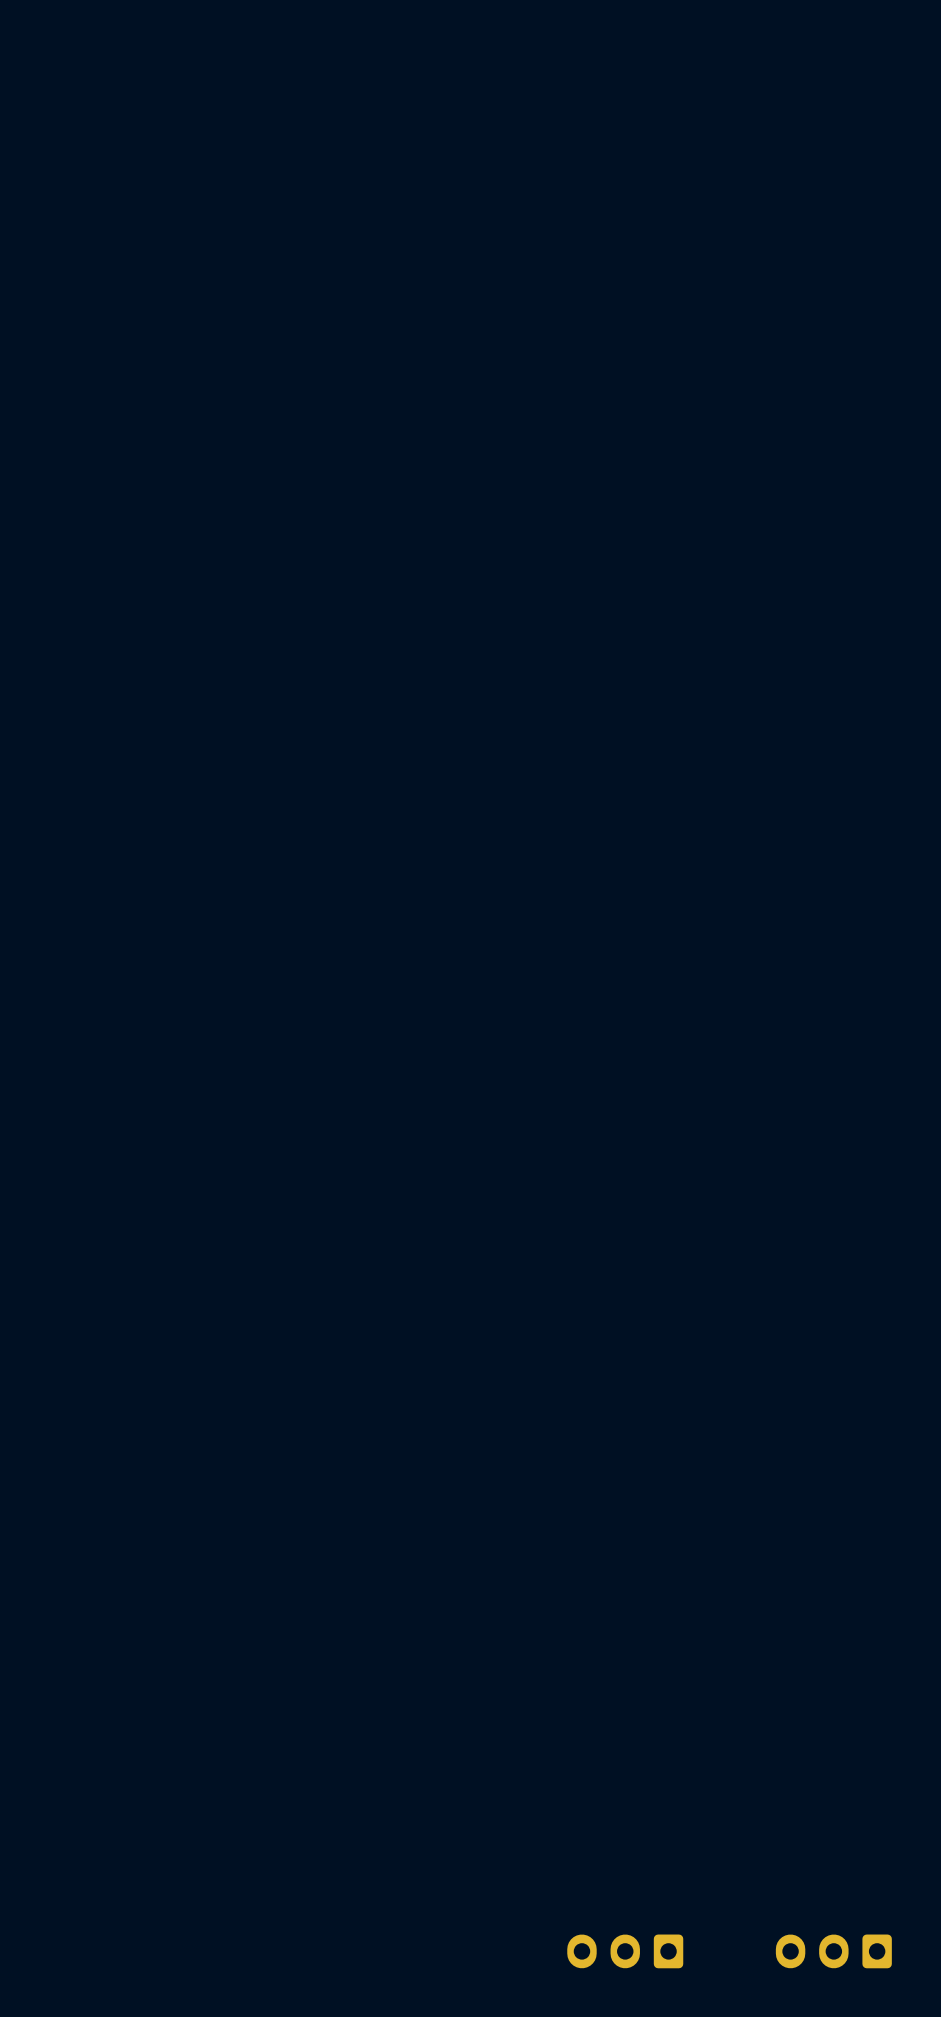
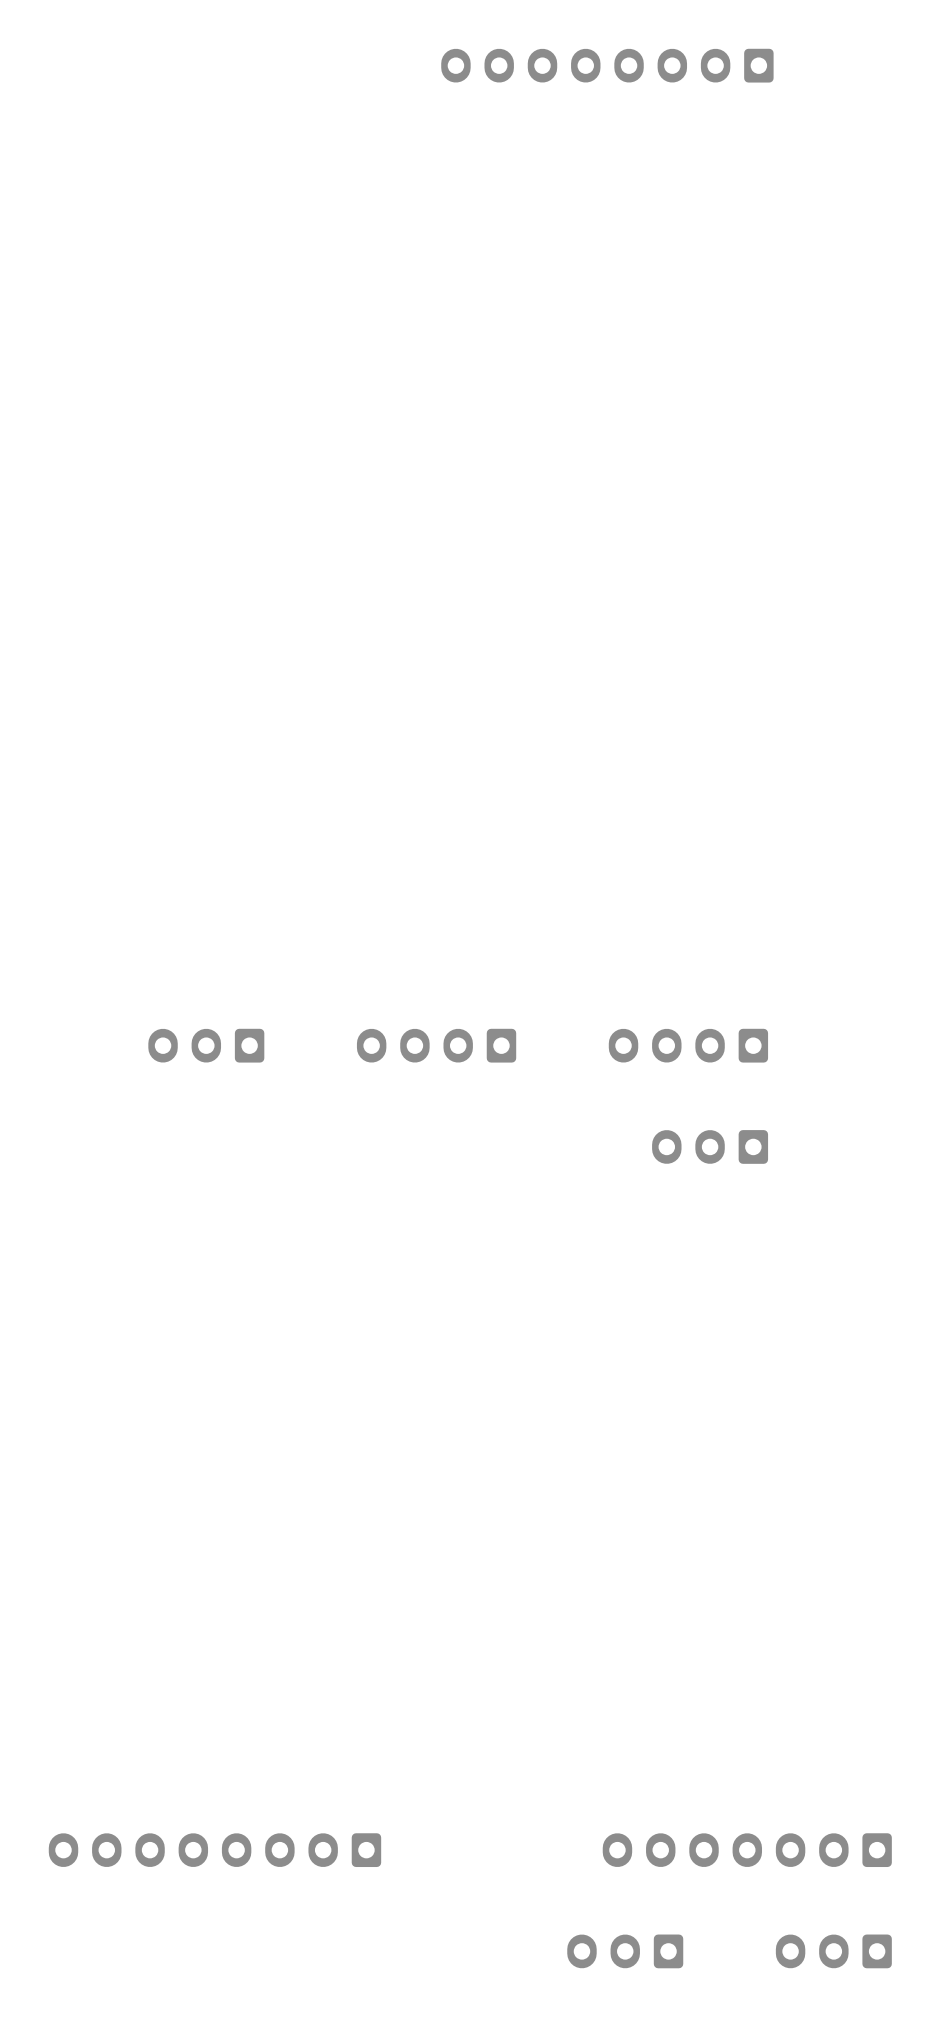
part: none -> (607, 65)
part: none -> (206, 1045)
part: none -> (436, 1045)
part: none -> (688, 1045)
part: none -> (710, 1146)
part: none -> (214, 1850)
part: none -> (747, 1850)

